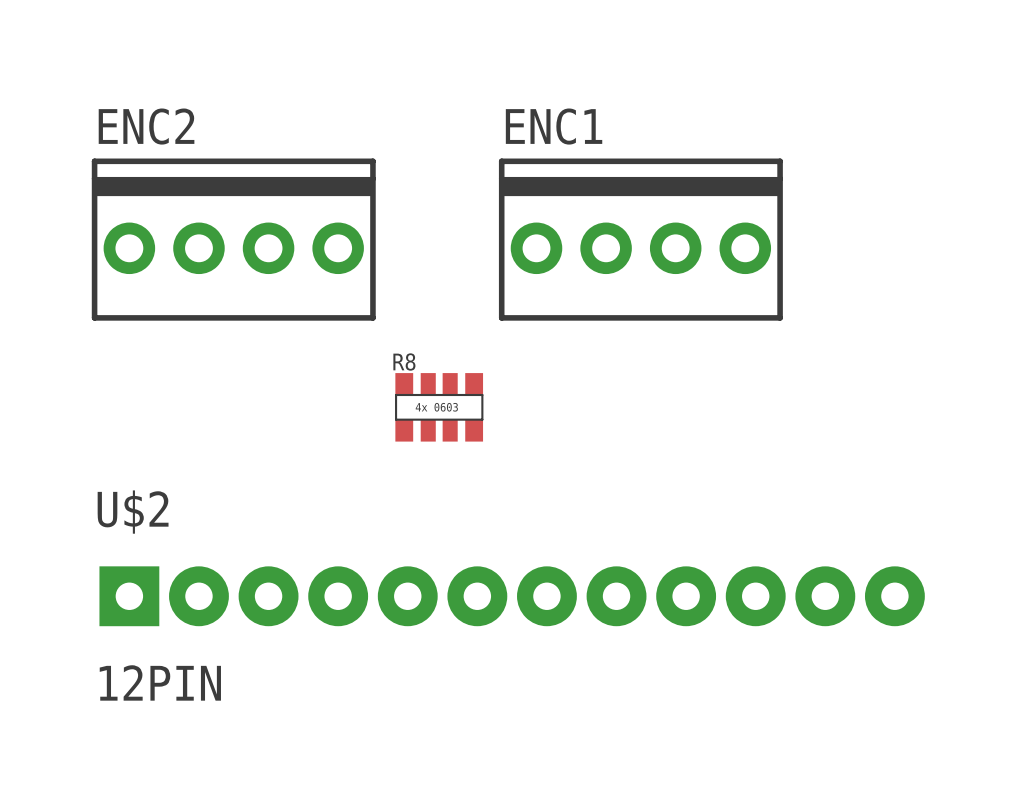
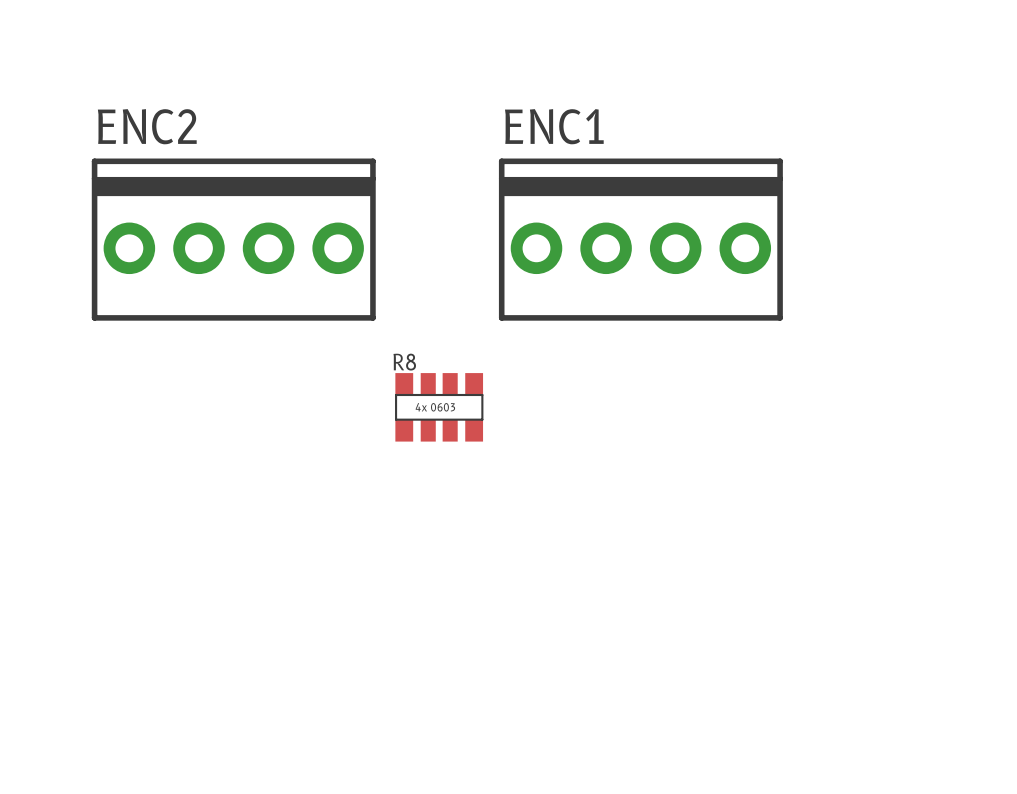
U$2: 12PIN (512, 596) -> none

